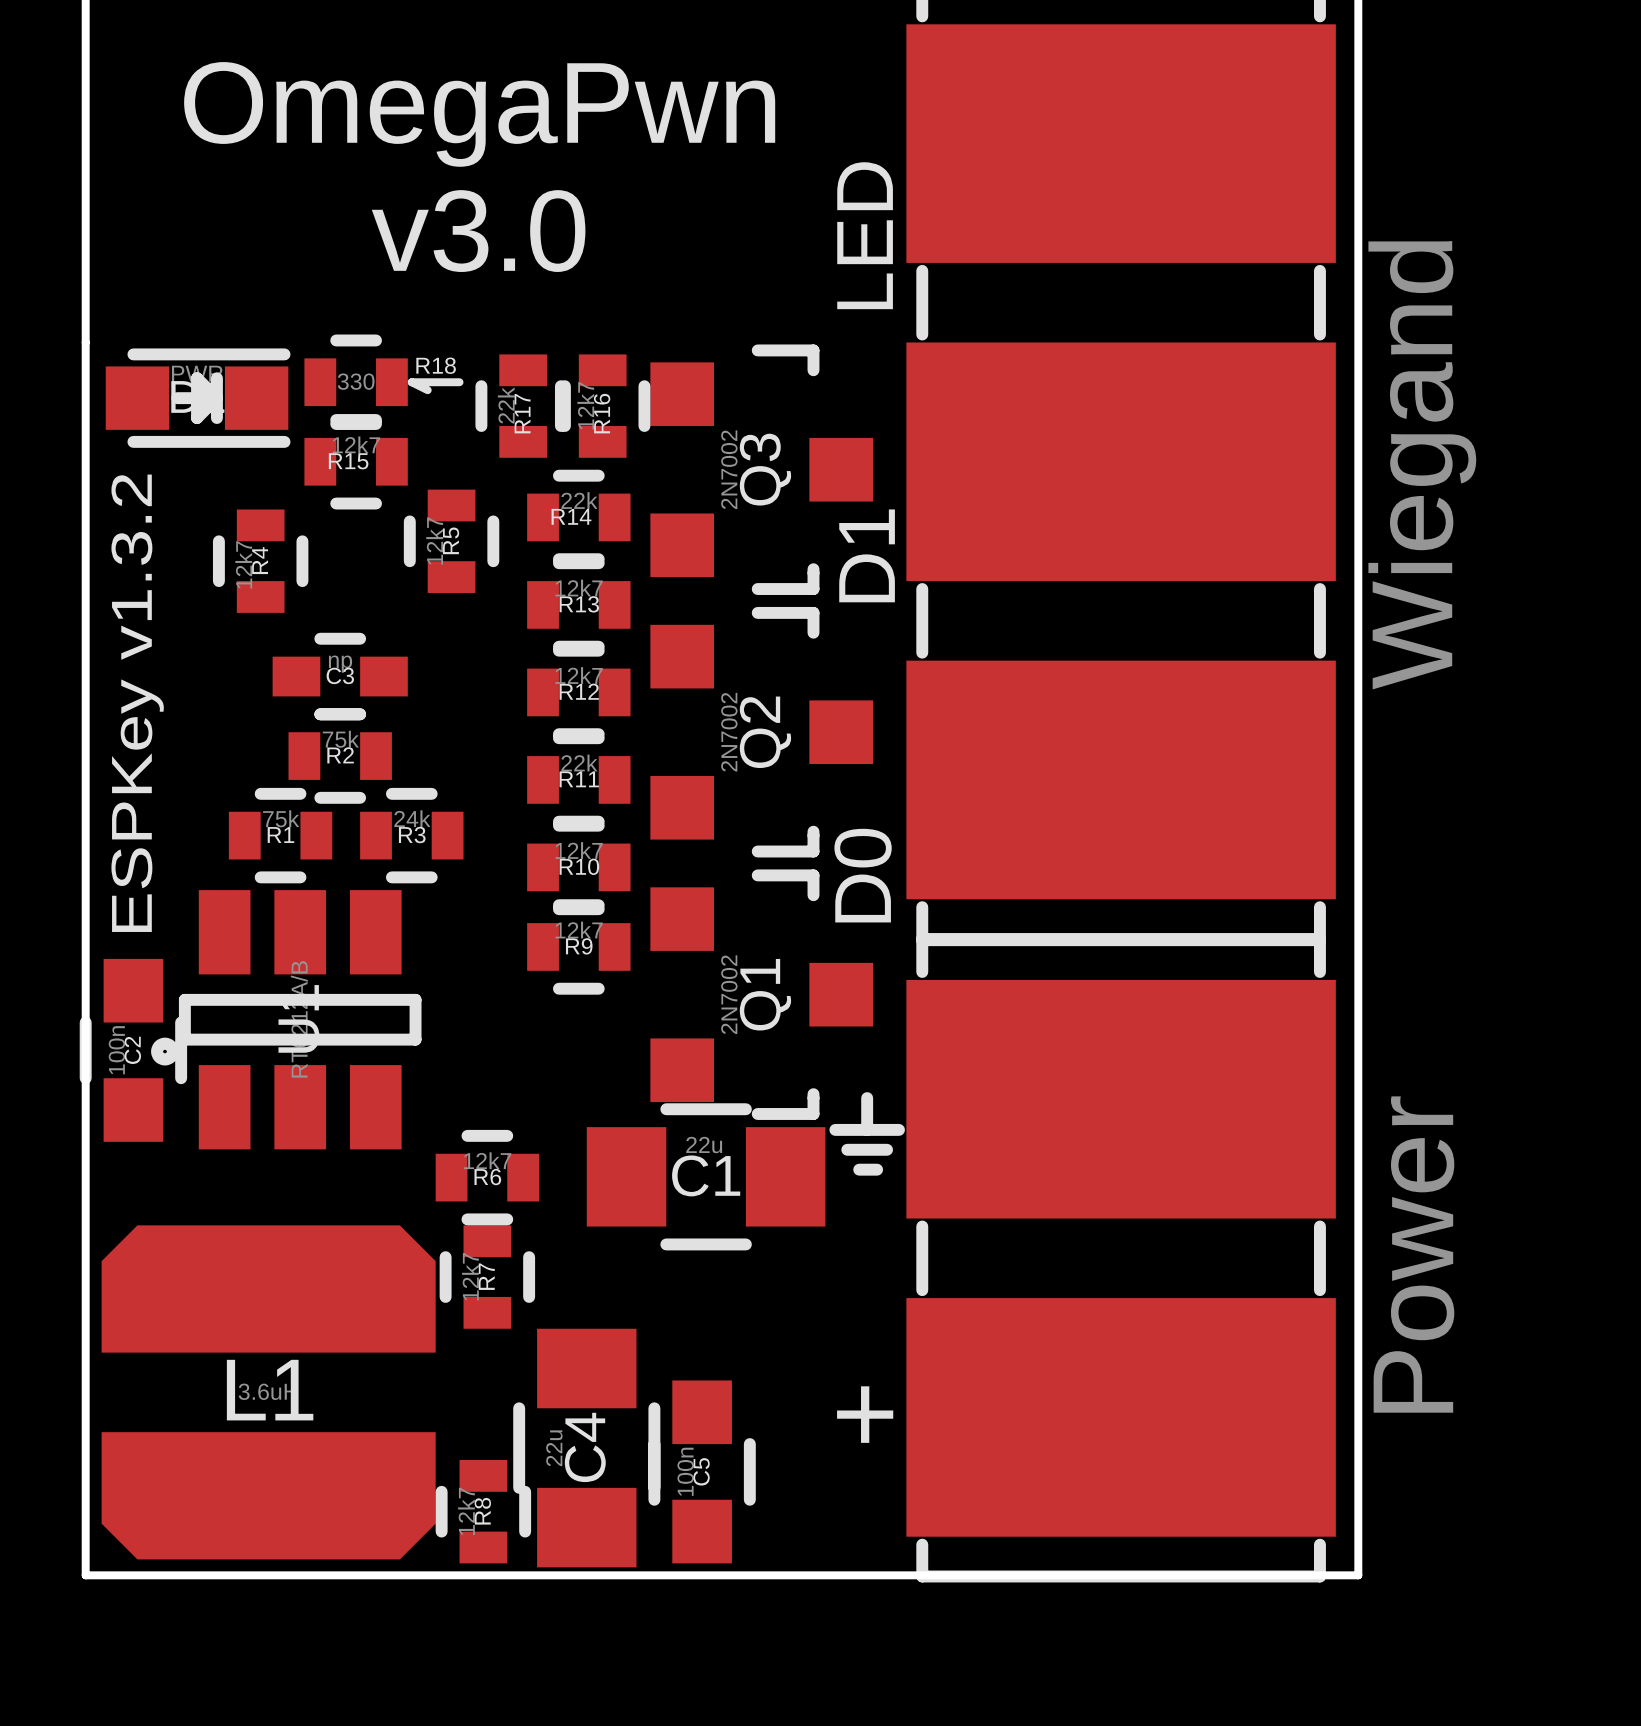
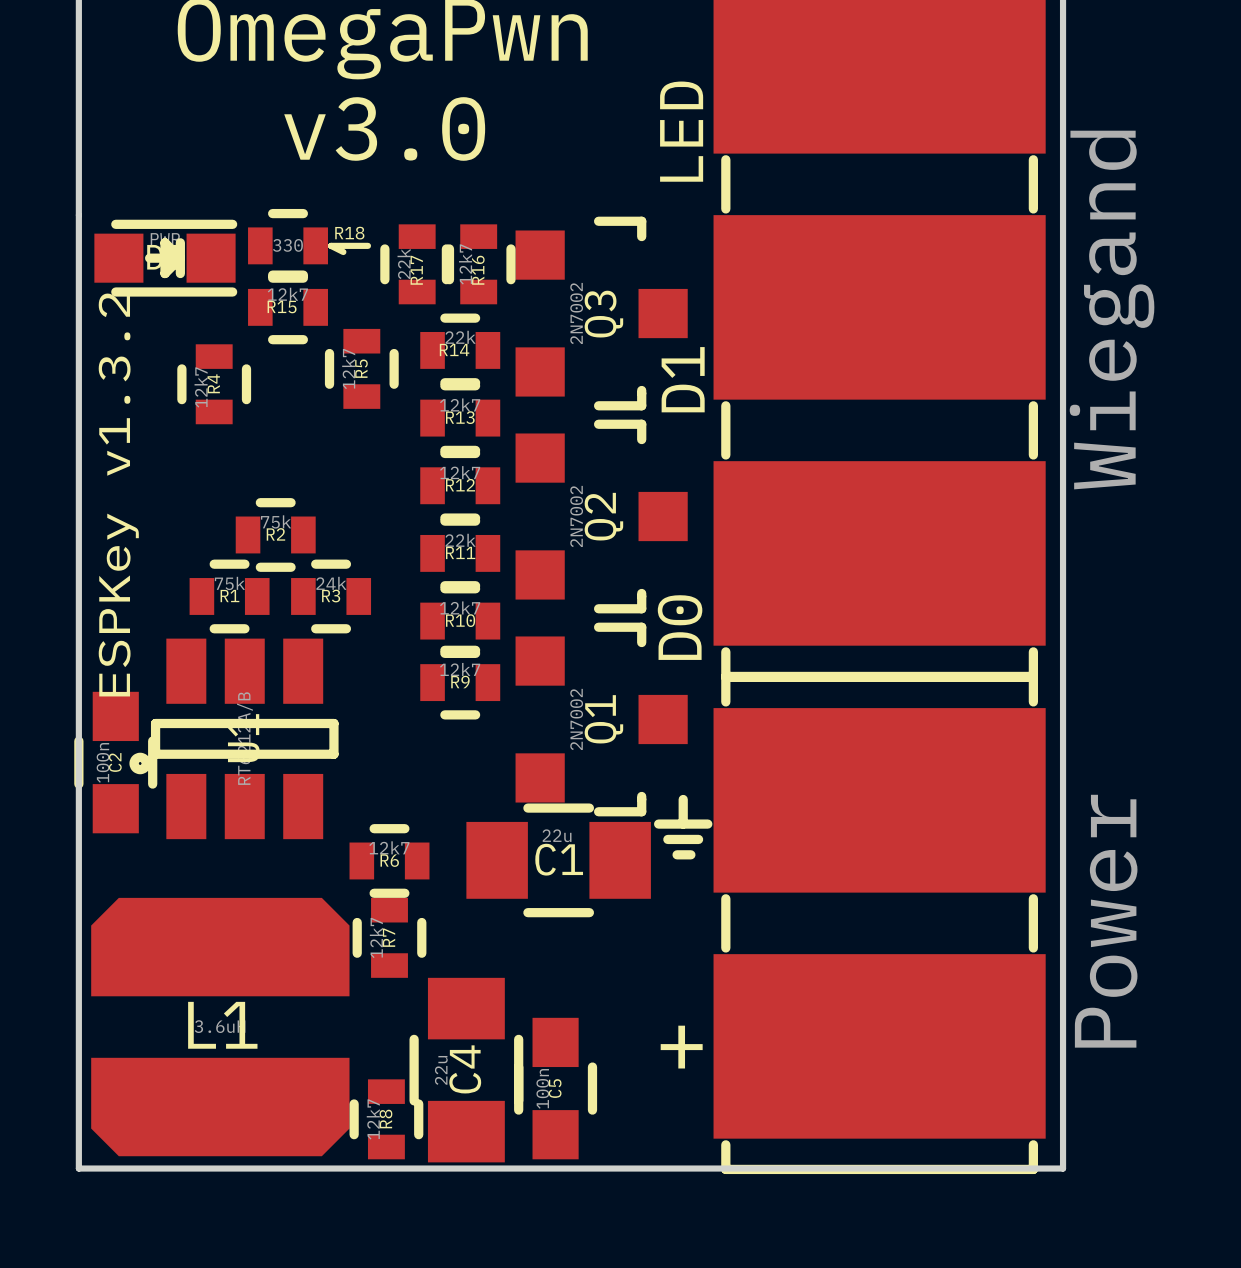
C3: np (340, 676) -> none

